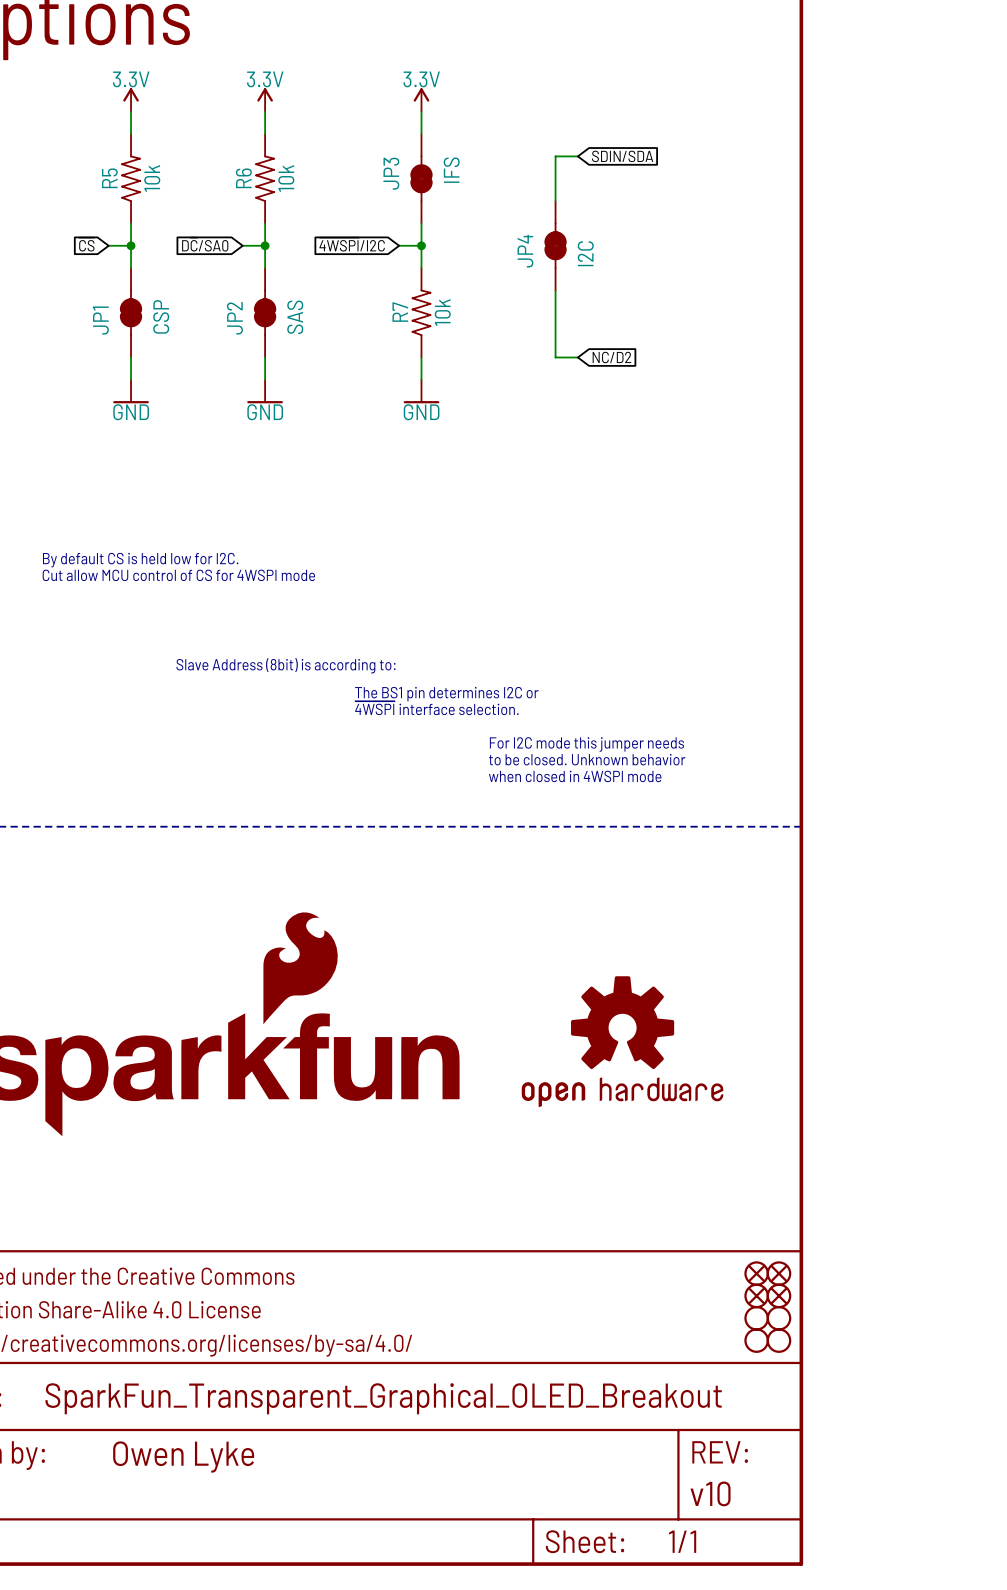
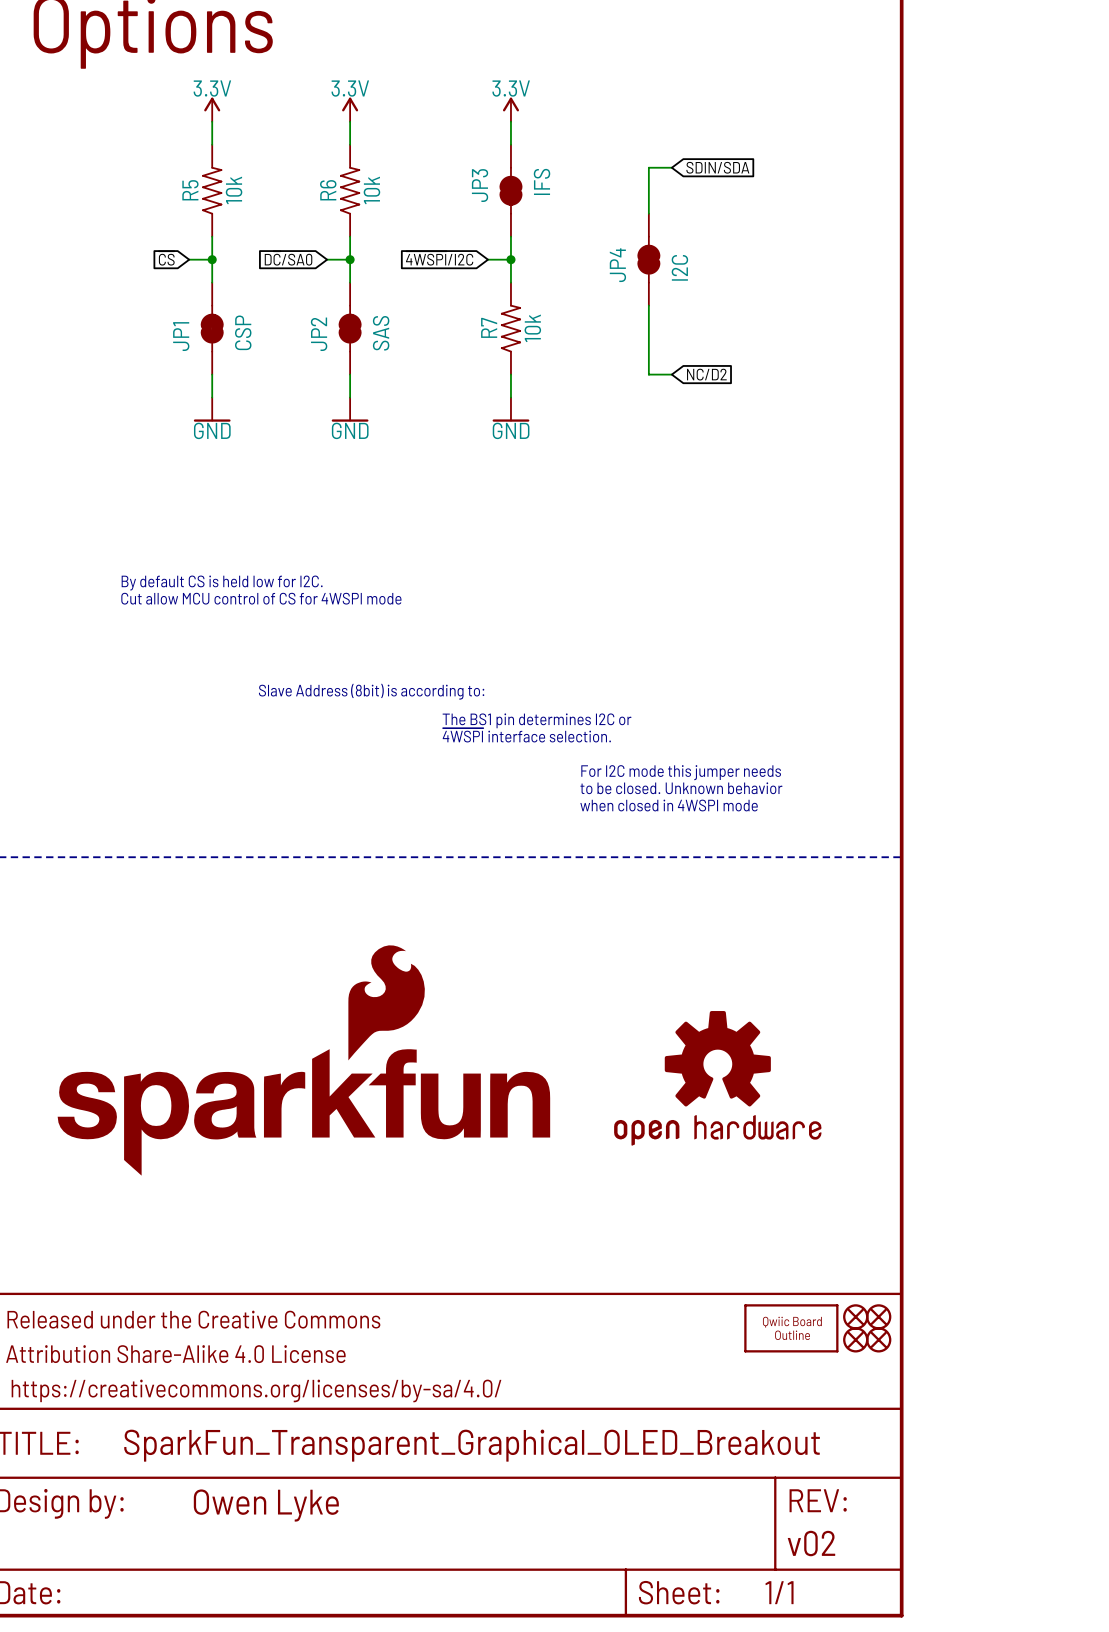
part: none -> (791, 1328)
part: (756, 1318) -> none
part: (778, 1318) -> none
part: (756, 1340) -> none
part: (778, 1340) -> none
part text: v10 (710, 1493) -> v02 (811, 1543)

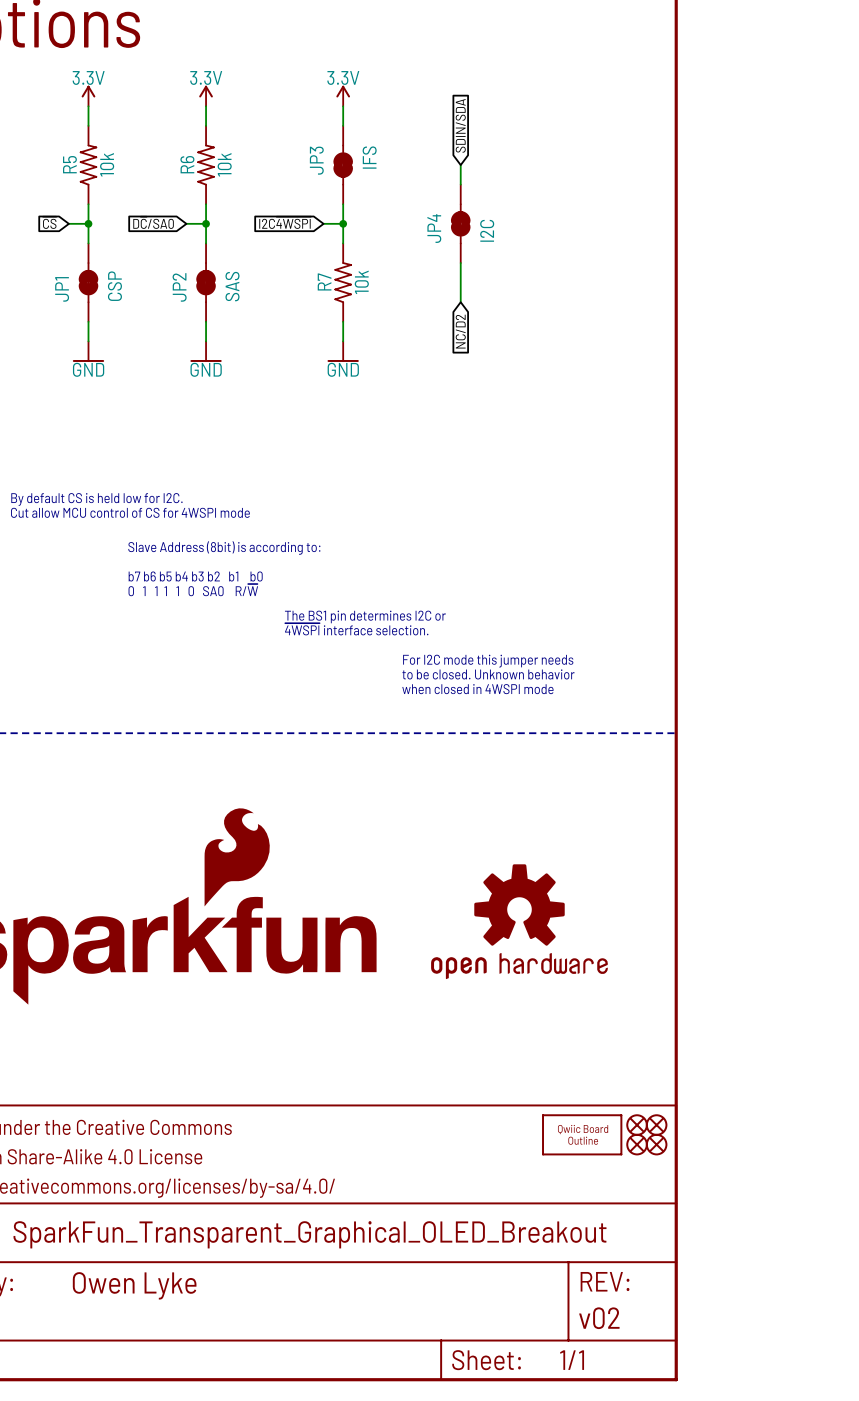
wire: (671, 167) (648, 167) (648, 190) -> none
global label rotation: 0° (717, 167) -> 90° counterclockwise (460, 125)
global label: ~{4WSPI}/I2C (439, 258) -> I2C~{4WSPI} (285, 222)
wire: (648, 351) (648, 374) (671, 374) -> none
global label rotation: 0° (706, 374) -> 90° clockwise (460, 331)
text: none -> Slave Address (8bit) is according to: (224, 548)
text: none -> b7 b6 b5 b4 b3 b2 b1 b0 (195, 576)
text: Slave Address (8bit) is according to: (371, 691) -> 0 1 1 1 1 0 SA0 R/~{W} (193, 590)

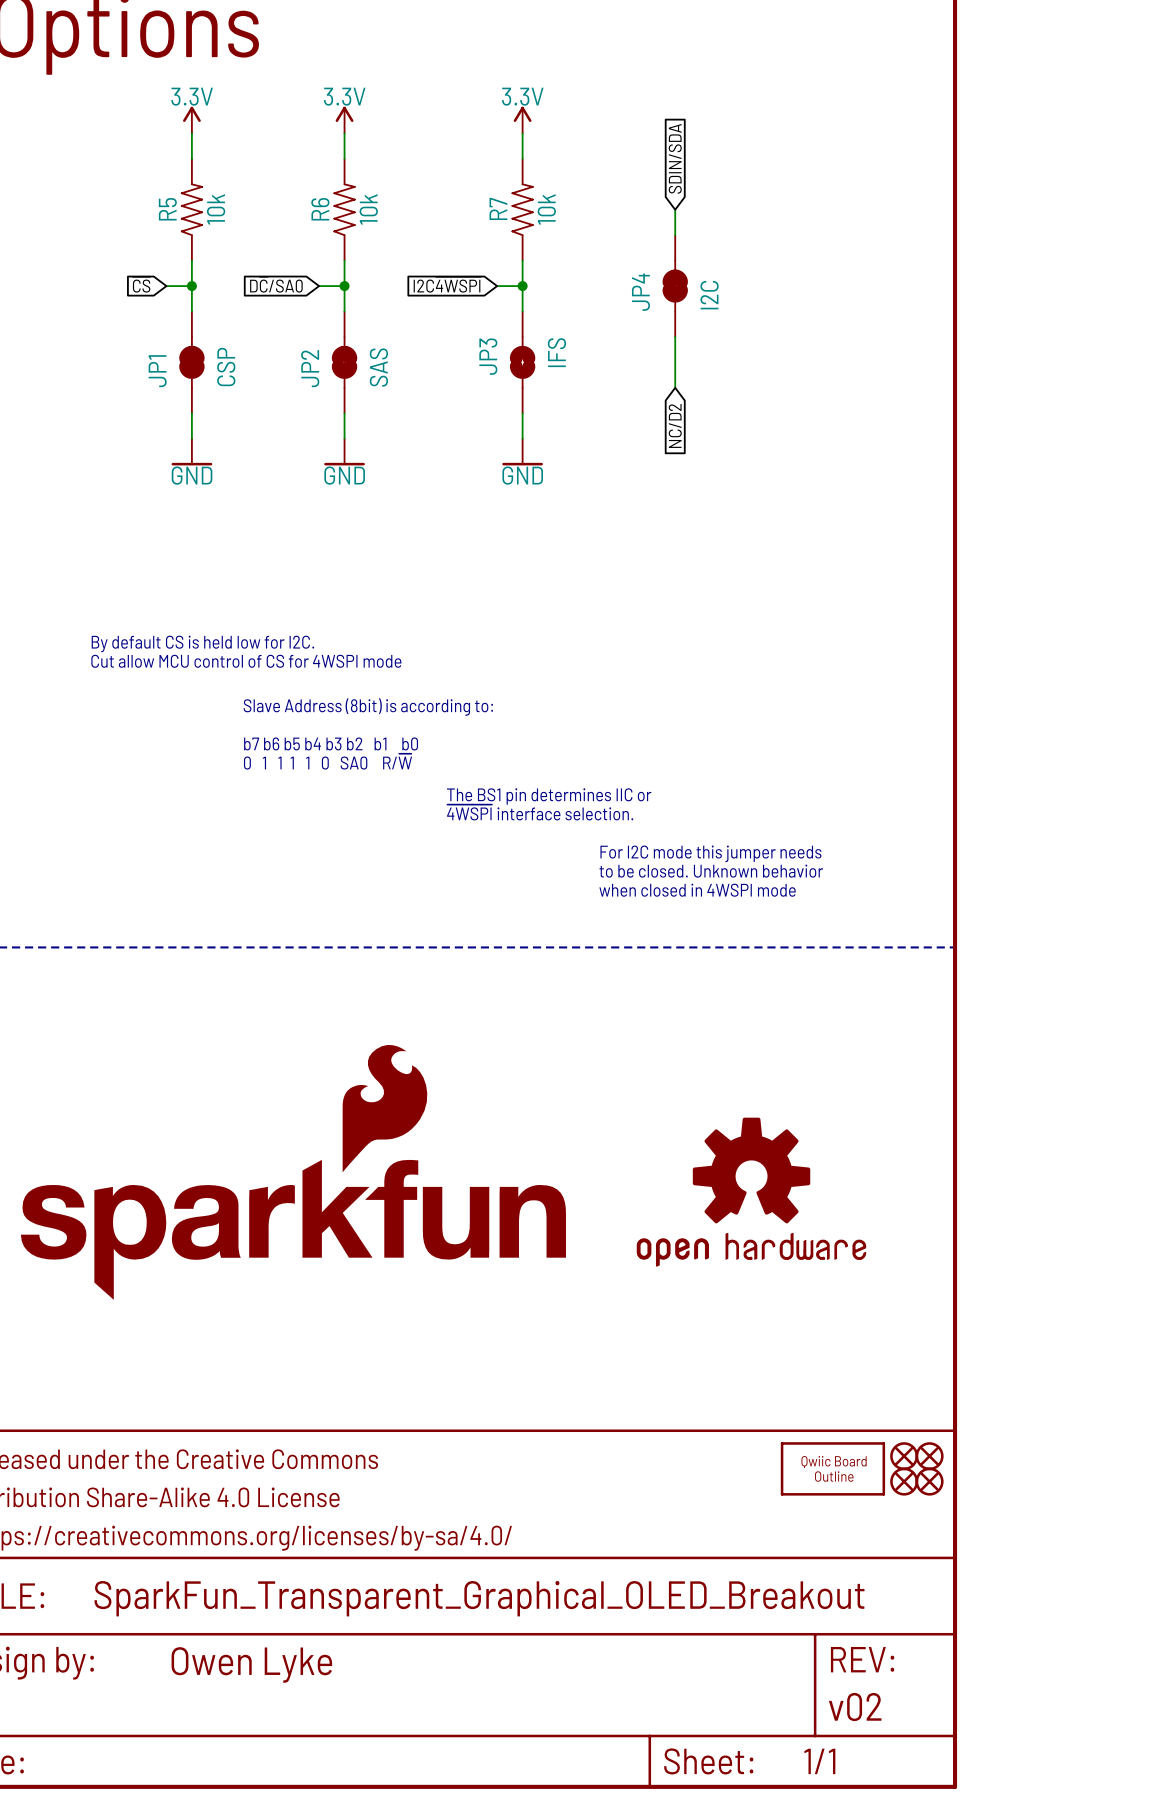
JP3 symbol: [333, 125, 353, 205] -> [509, 311, 536, 414]
R7 position: (343, 282) -> (522, 209)
text: The BS1 pin determines I2C or (365, 616) -> The BS1 pin determines IIC or (549, 796)

